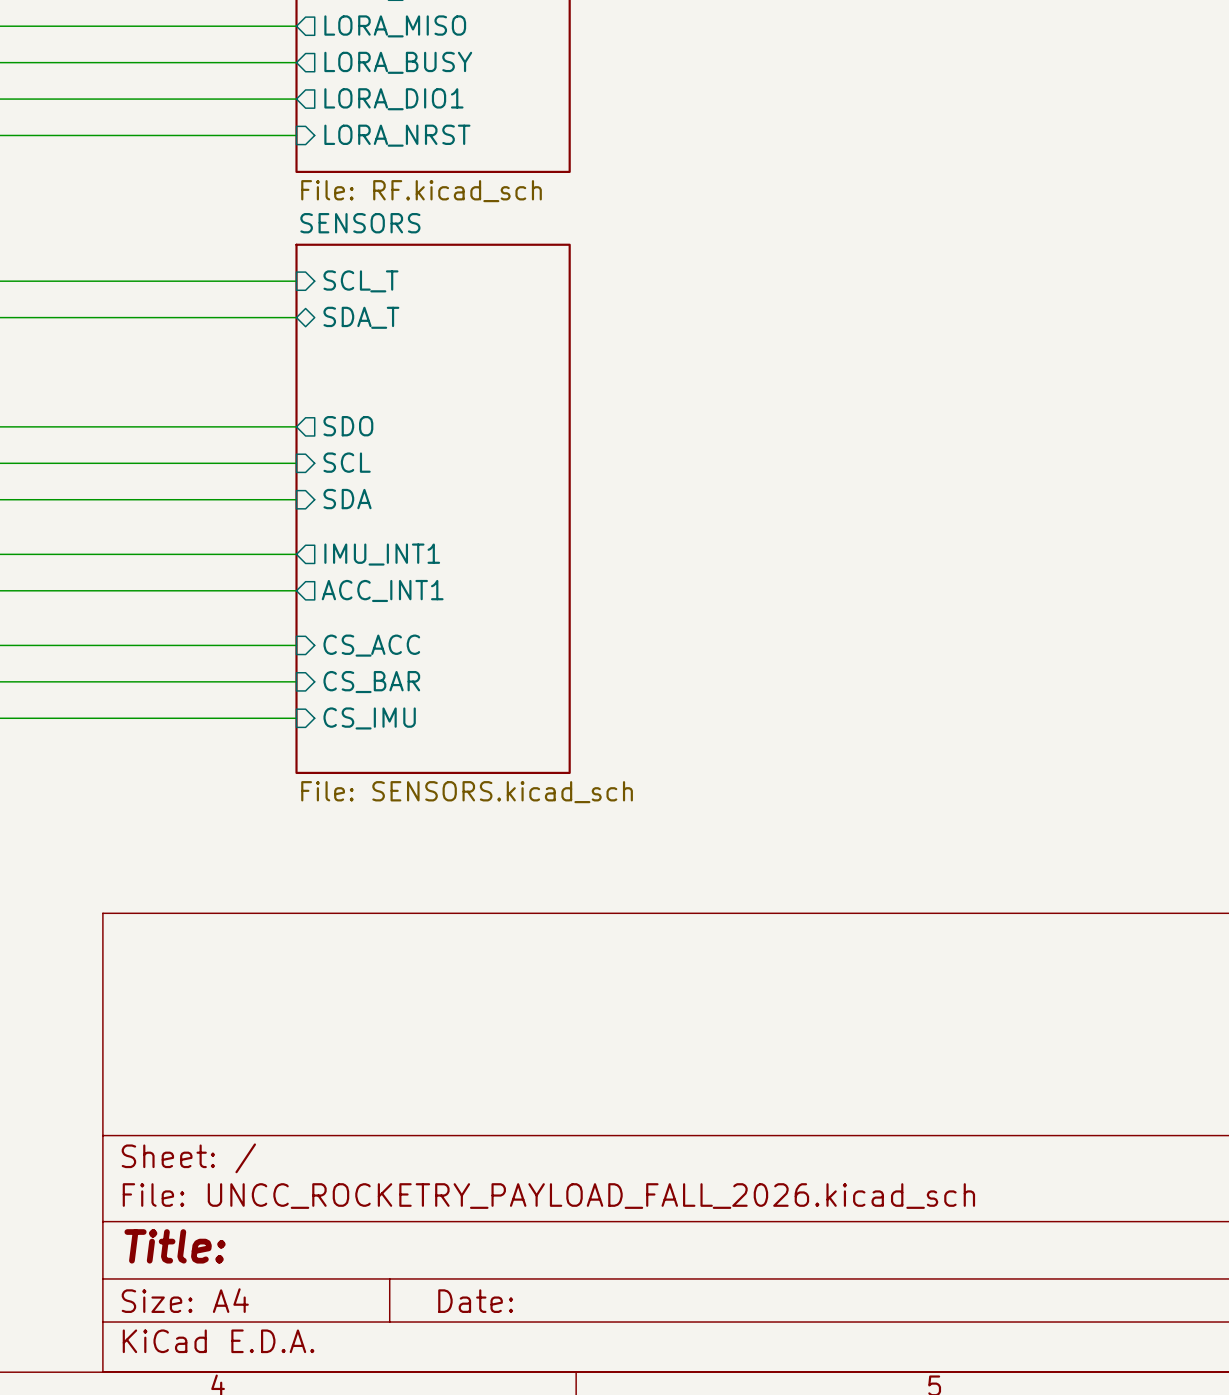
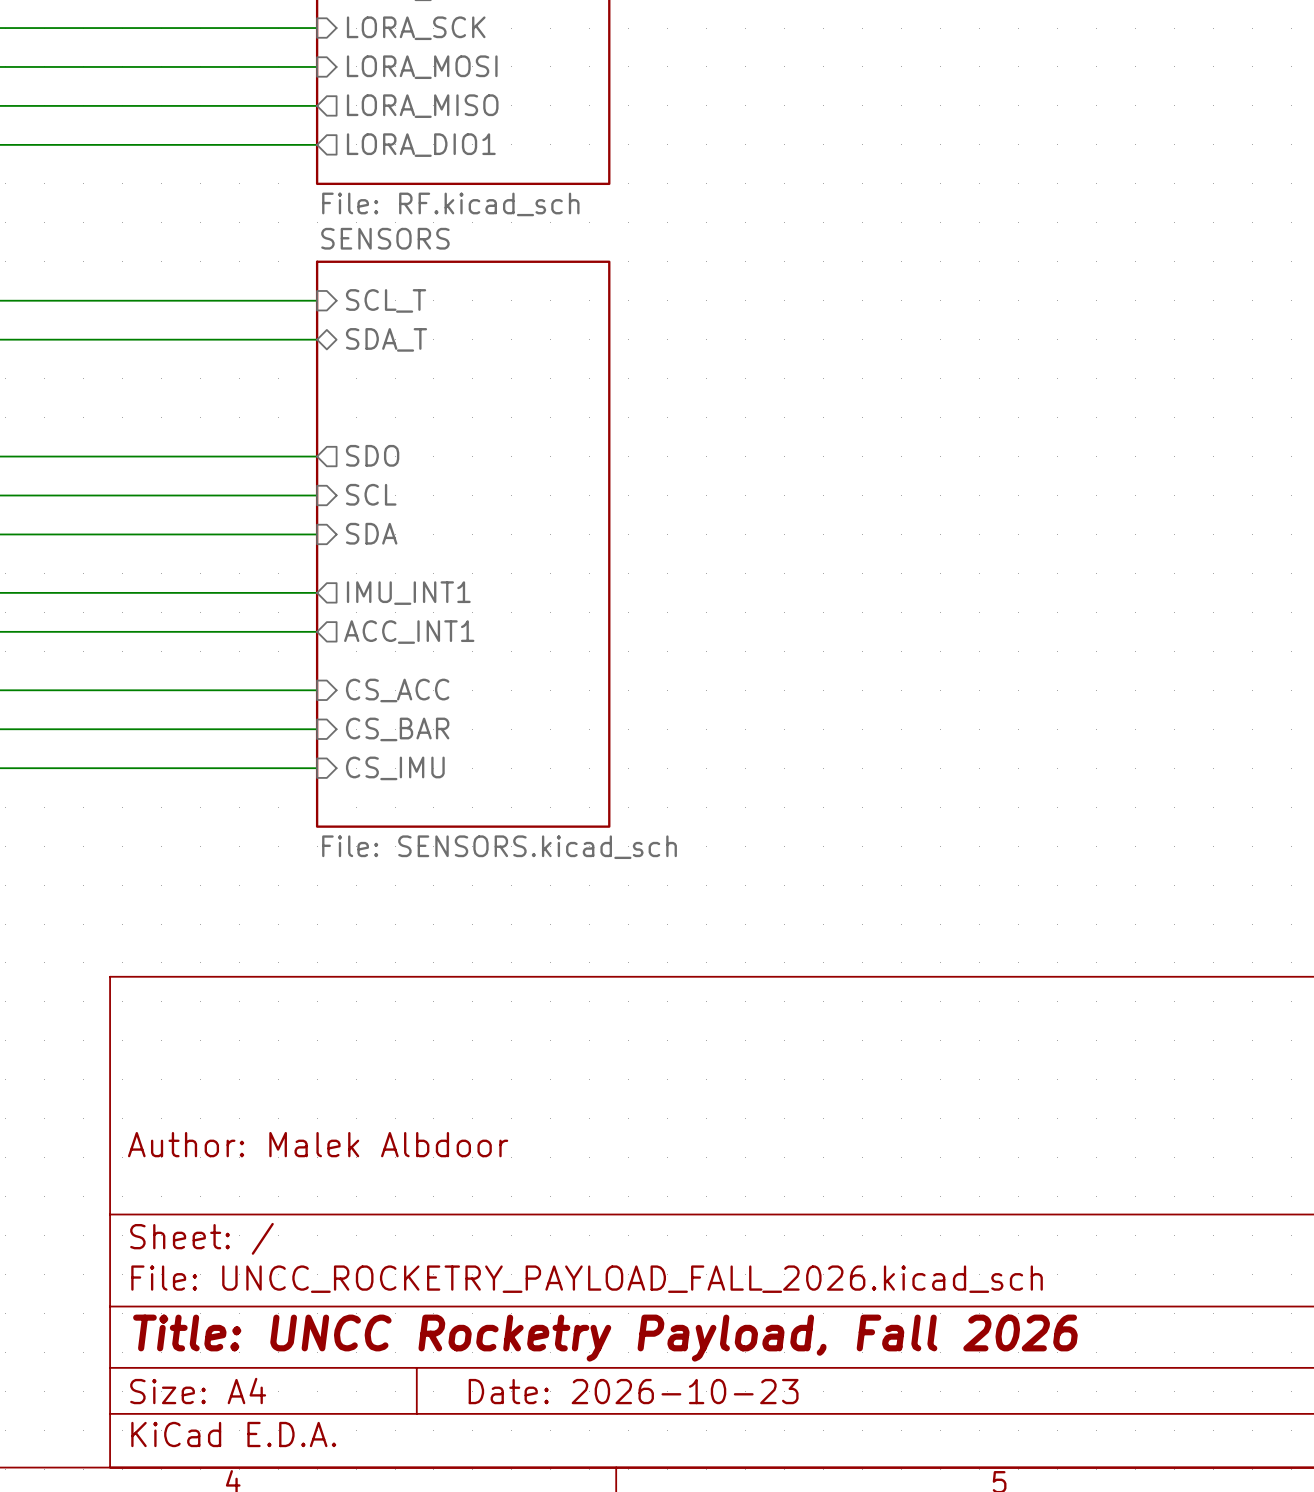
sheet pin shape: output (395, 26) -> input (416, 28)
sheet pin: LORA_MISO (395, 26) -> LORA_SCK (416, 28)
sheet pin shape: output (398, 62) -> input (422, 67)
sheet pin: LORA_BUSY (398, 62) -> LORA_MOSI (422, 67)
sheet pin: LORA_DIO1 (393, 99) -> LORA_MISO (422, 106)
sheet pin shape: input (397, 135) -> output (421, 145)
sheet pin: LORA_NRST (397, 135) -> LORA_DIO1 (421, 145)
title block: none -> Author: Malek Albdoor (318, 1144)
title block: Title: (175, 1246) -> Title: UNCC Rocketry Payload, Fall 2026 (605, 1338)
title block: Date: (475, 1301) -> Date: 2026-10-23 (633, 1391)

